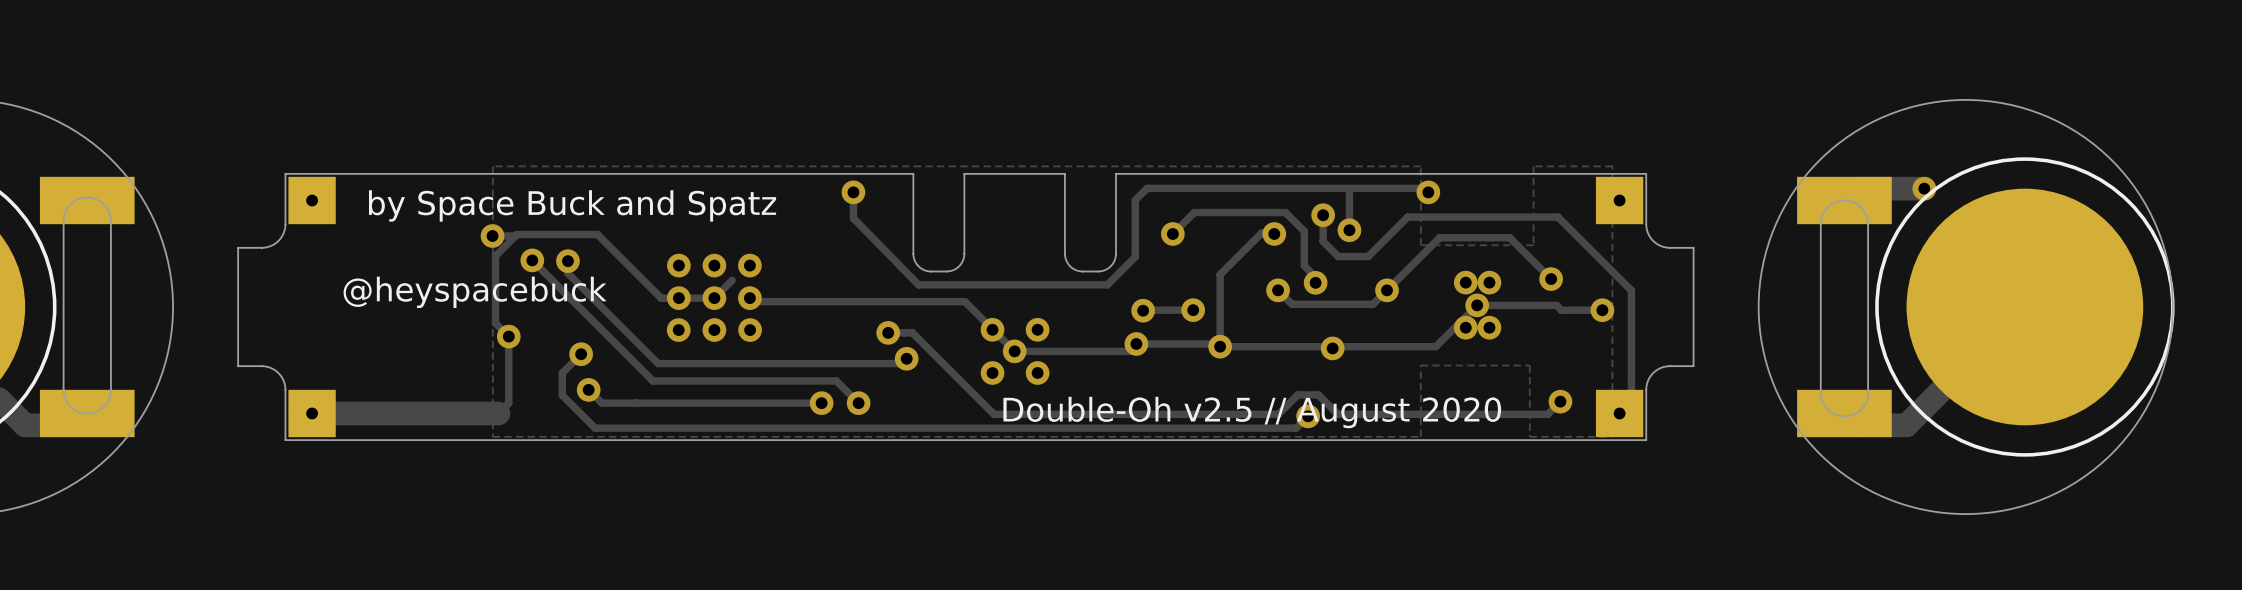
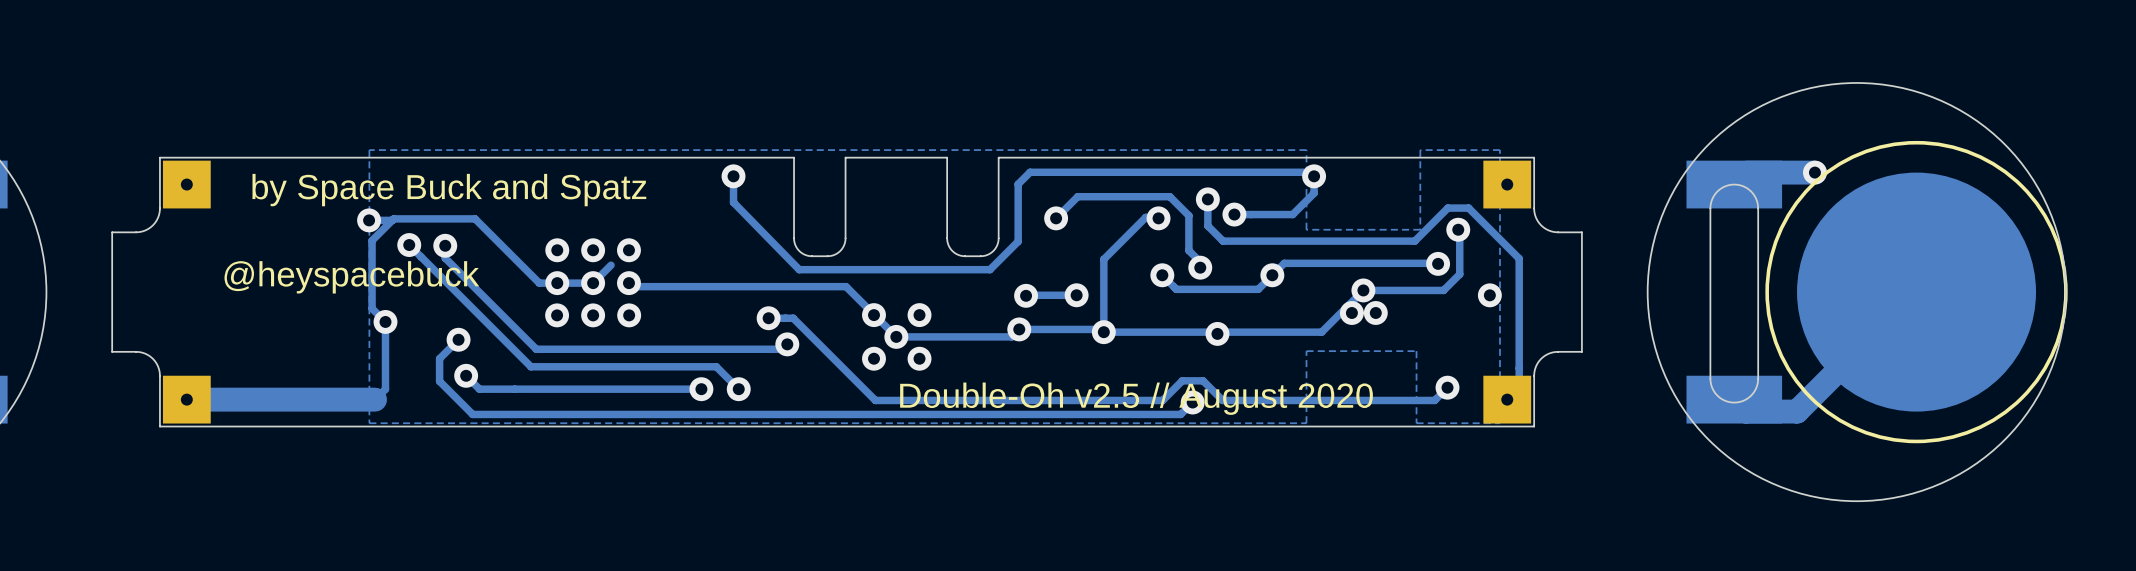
track: (1349, 188) (1349, 230) -> (1314, 176) (1314, 193) (1292, 214) (1234, 214)
via: none -> (1458, 229)
track: (1368, 256) (1407, 217) (1557, 217) (1631, 290) -> (1253, 241) (1414, 241) (1447, 208) (1468, 208) (1519, 258) (1519, 275)
track: (1550, 278) (1509, 237) (1439, 237) (1398, 278) -> (1437, 263) (1284, 263)
via: (1465, 282) -> none
via: (1489, 282) -> none
track: (1556, 305) (1561, 310) (1602, 310) -> (1443, 290) (1459, 274) (1458, 229)

